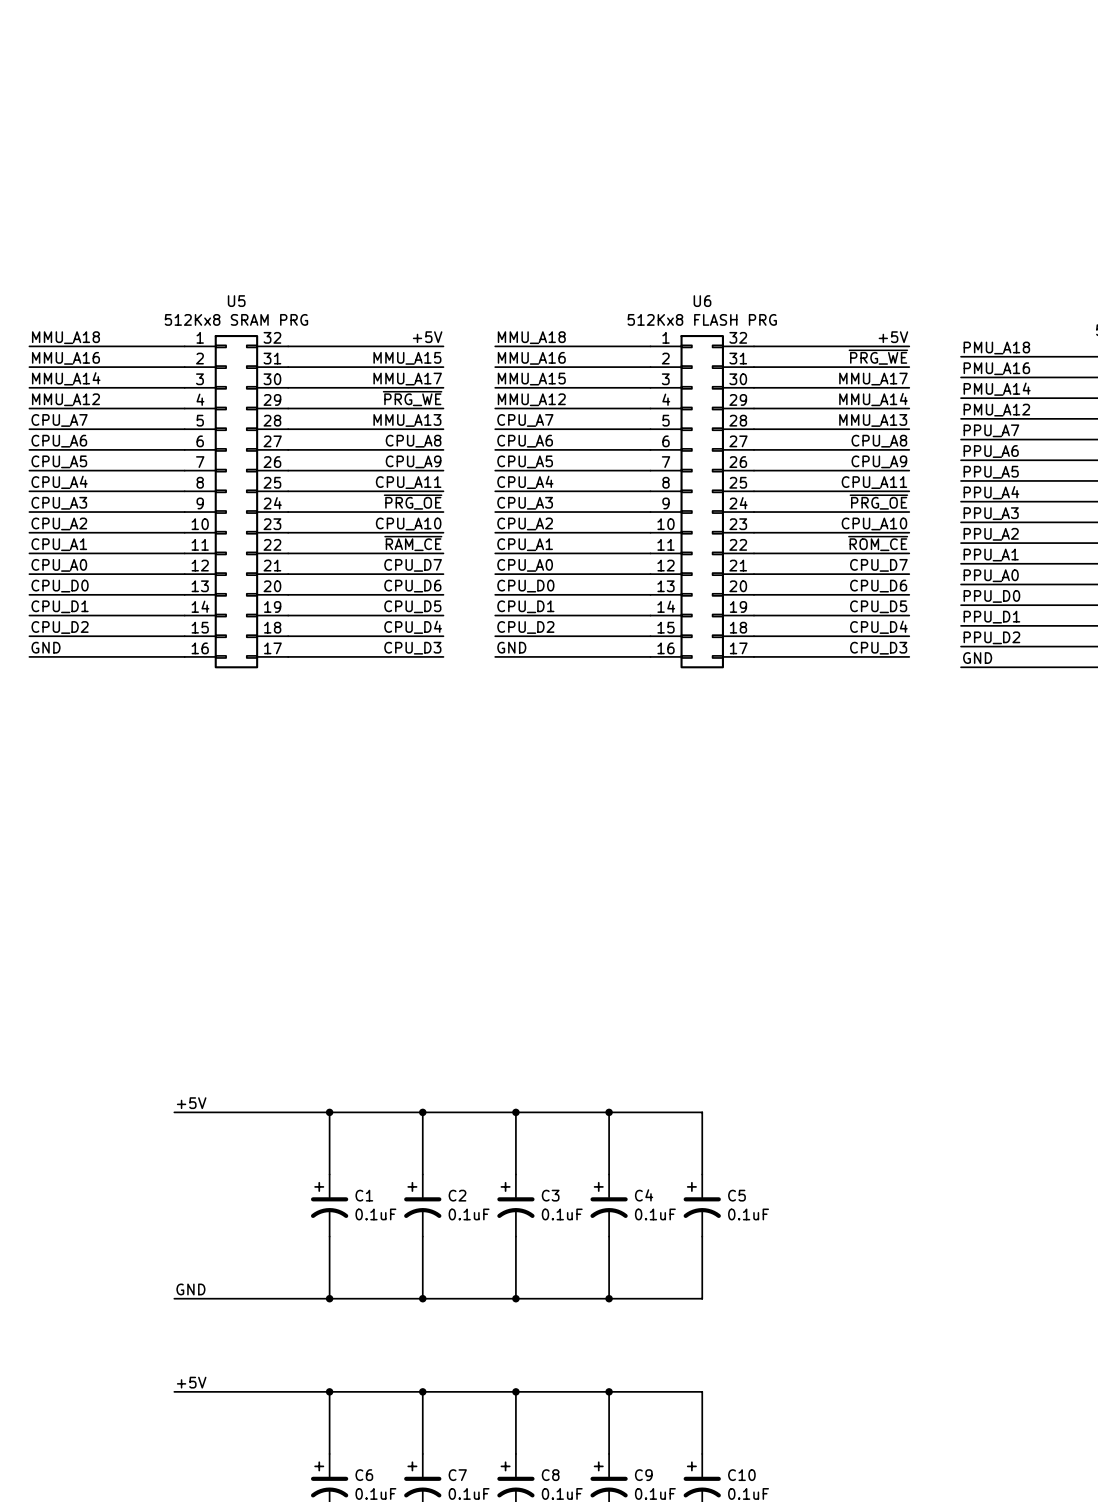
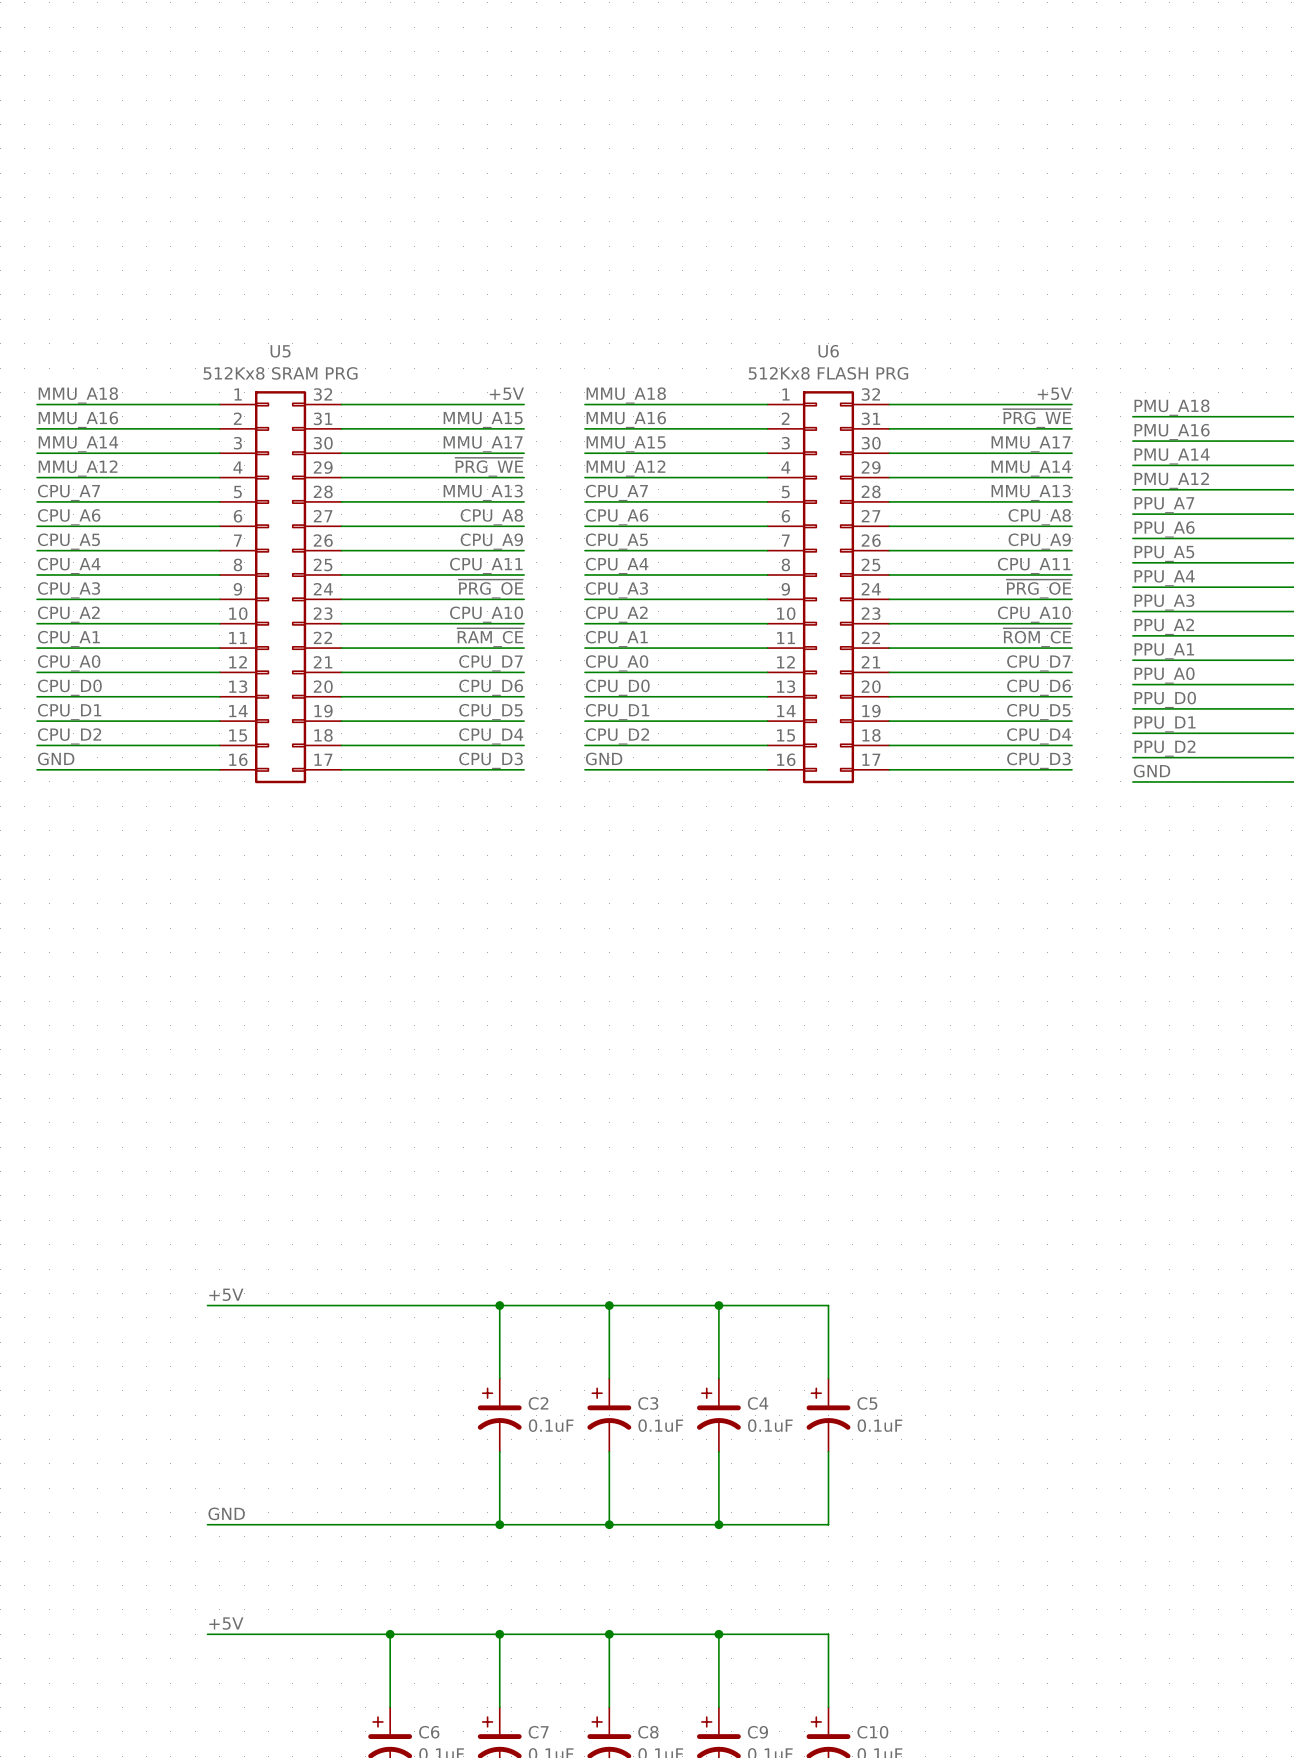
wire: (329, 1112) (329, 1174) -> none
junction: (329, 1112) -> none
C1: 0.1uF (329, 1205) -> none
wire: (329, 1236) (329, 1298) -> none
junction: (329, 1298) -> none

